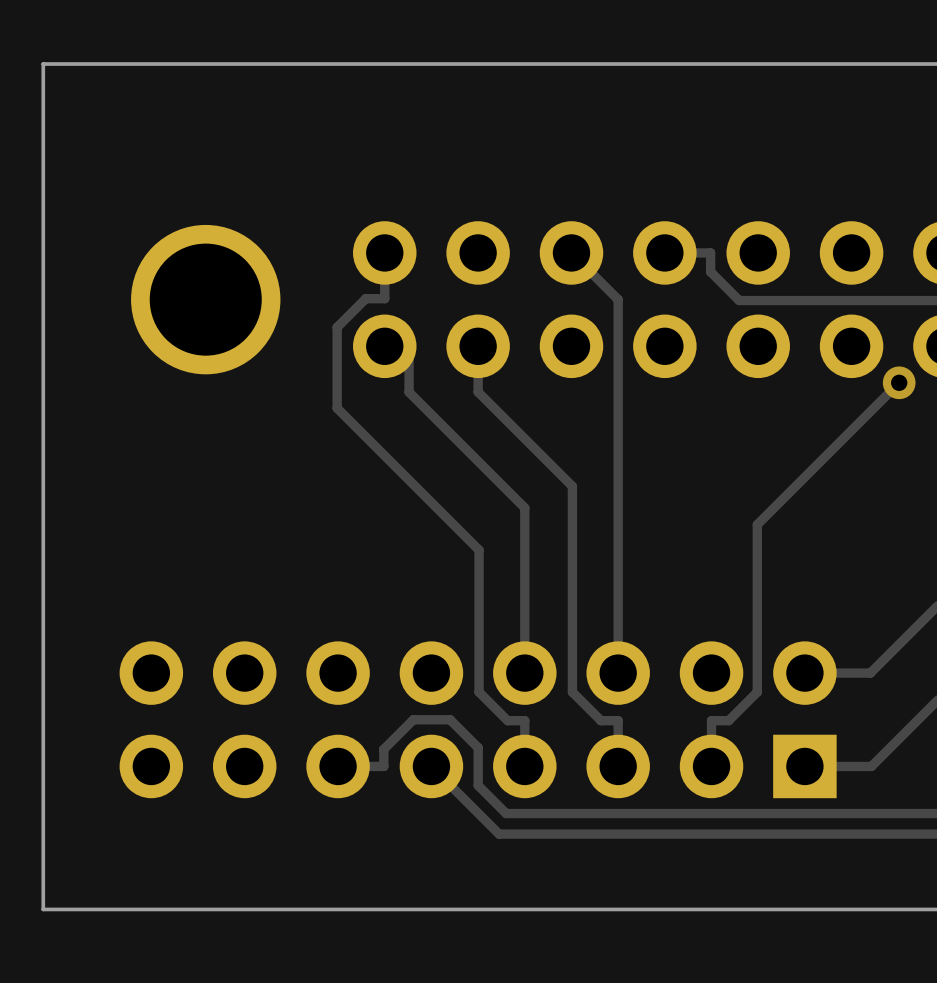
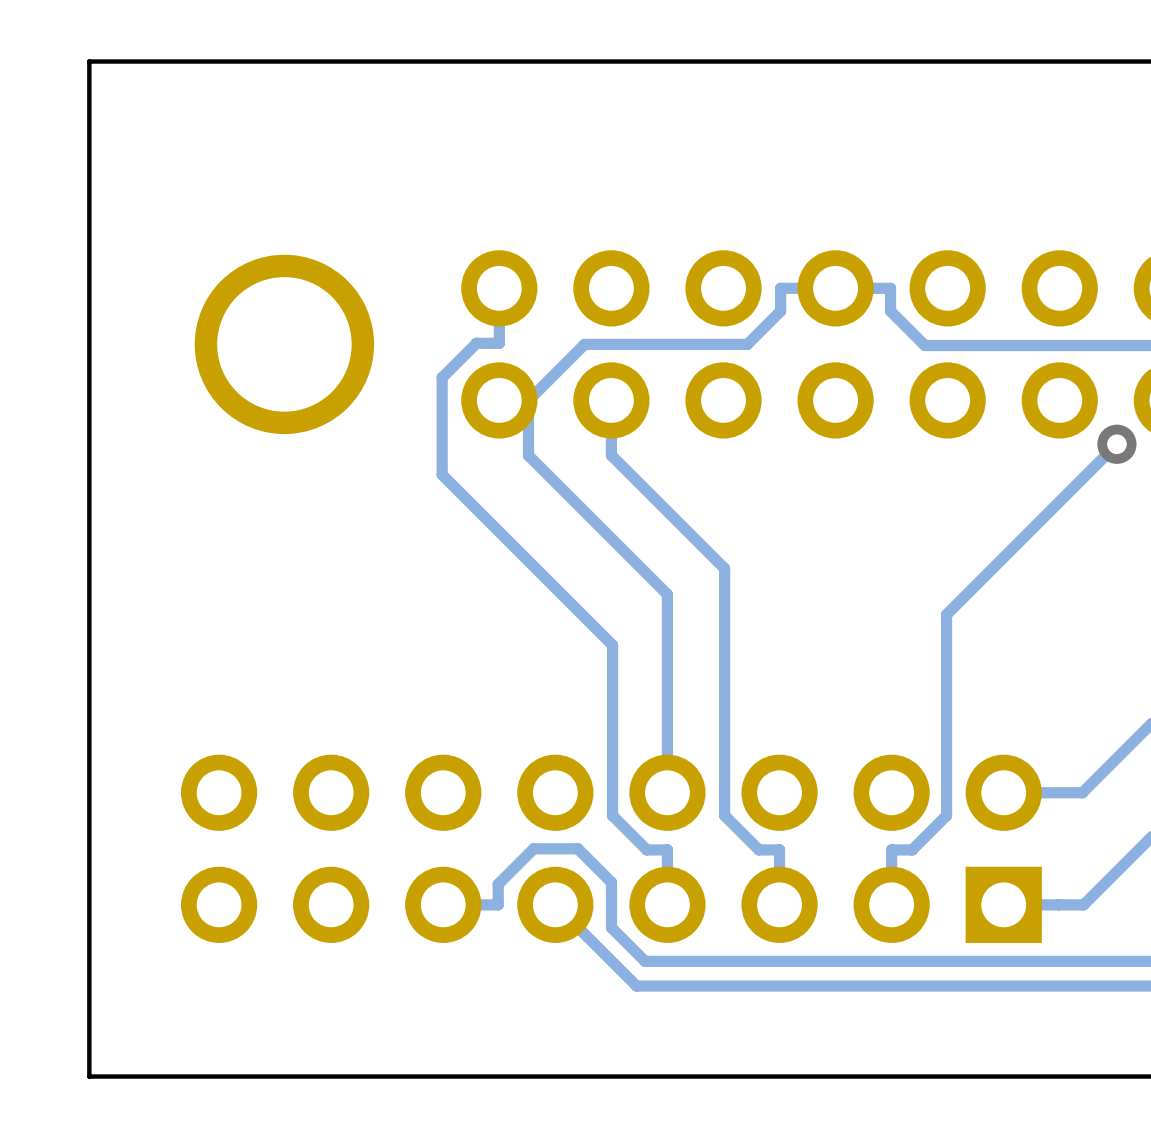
track: (571, 252) (618, 299) (618, 673) -> none
track: none -> (835, 288) (780, 288) (780, 311) (747, 344) (584, 344) (528, 400)

